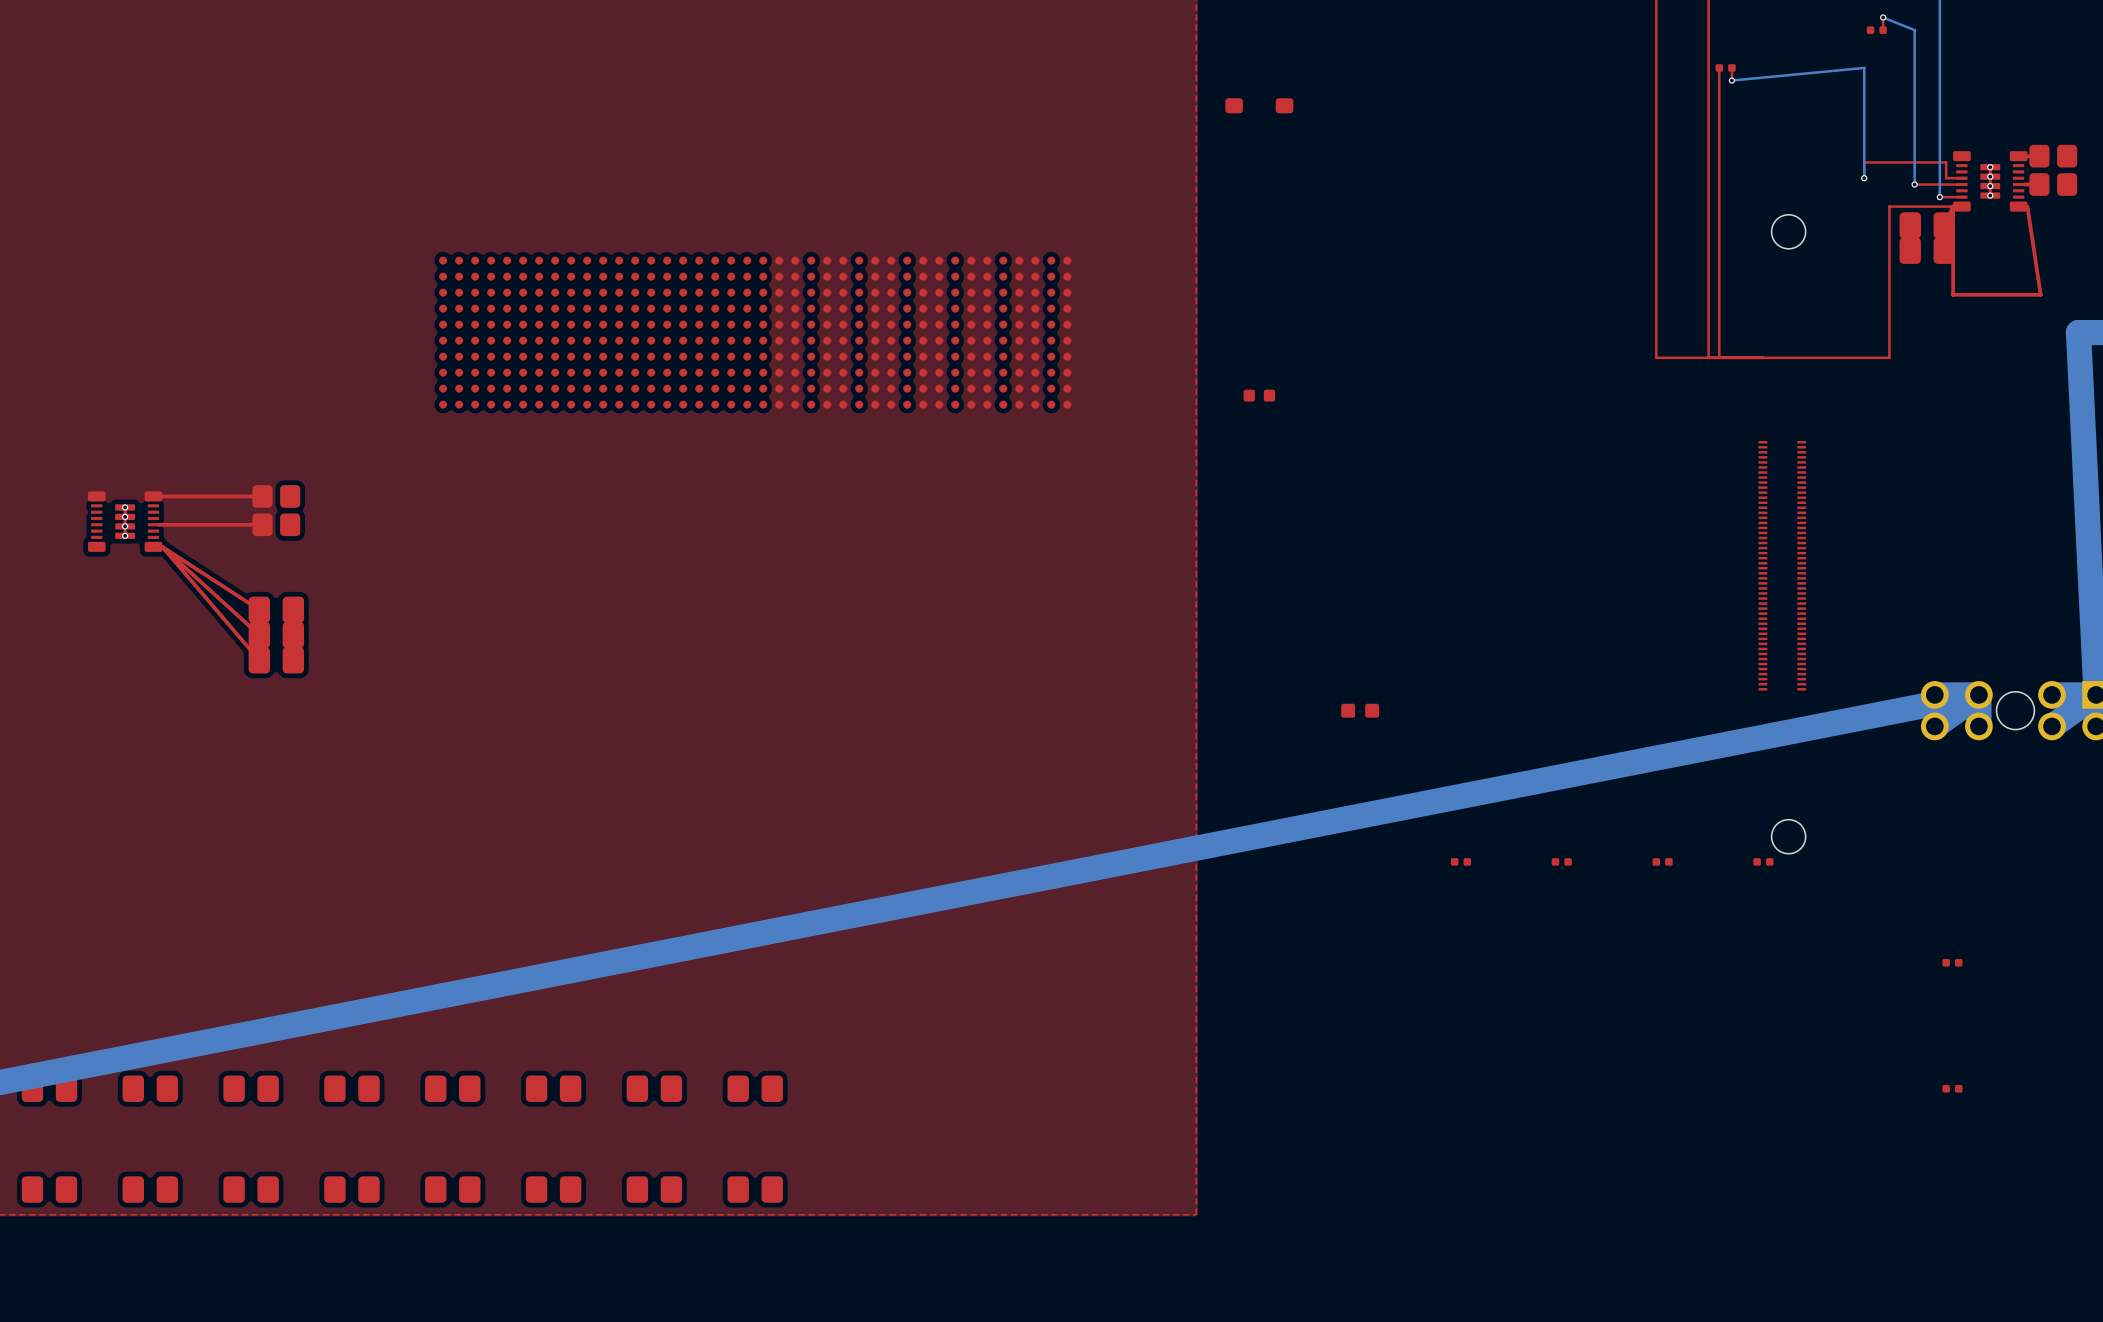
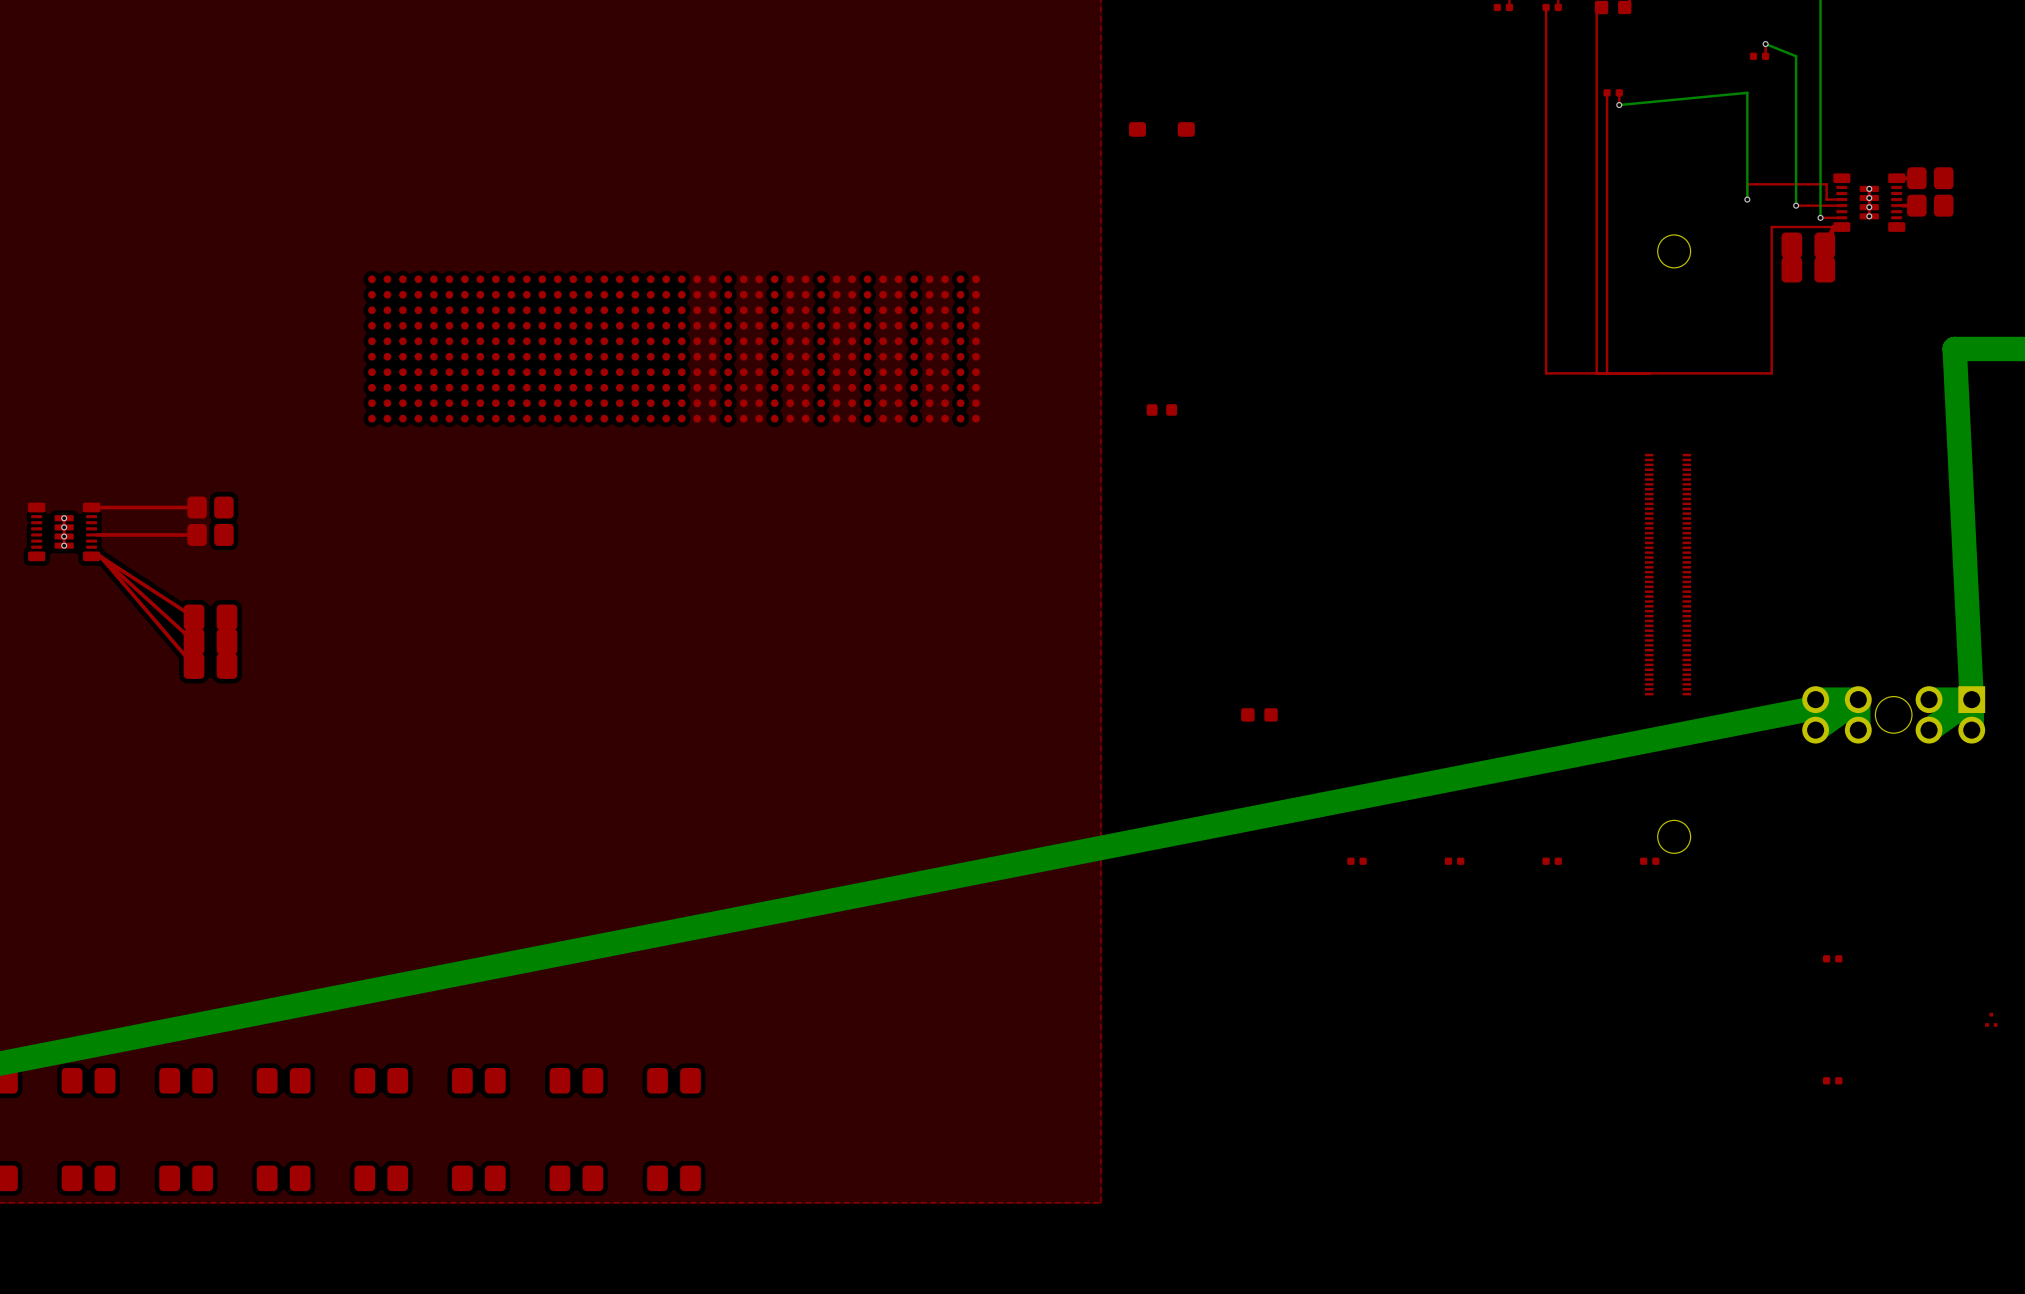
top track: (2027, 206) (2040, 294) (1953, 294) (1953, 206) -> none

